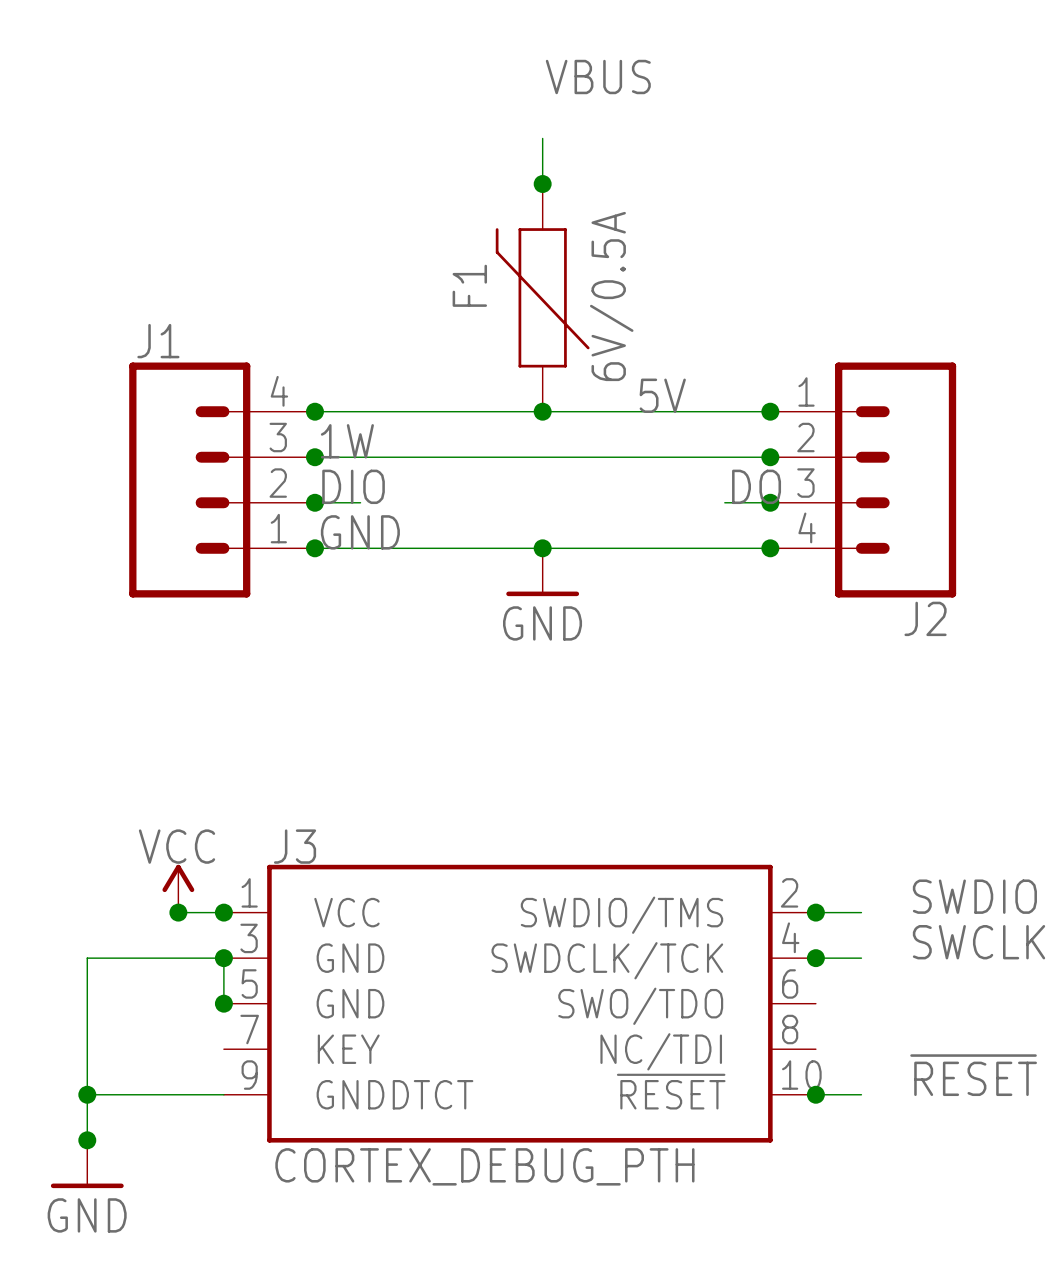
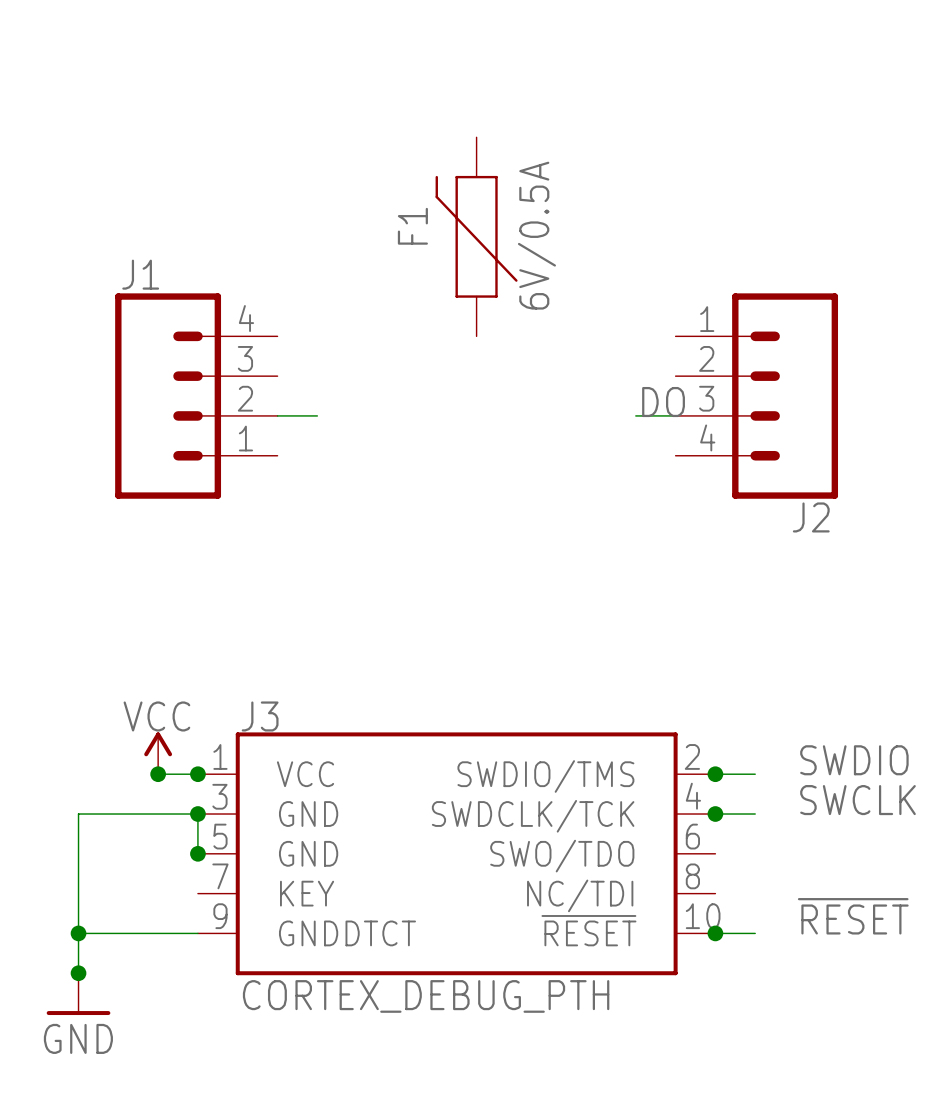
label: VBUS (598, 77) -> none
wire: (542, 138) (542, 184) -> none
junction: (542, 184) -> none
label: 5V (662, 395) -> none
wire: (314, 411) (770, 411) -> none
junction: (314, 411) -> none
junction: (542, 411) -> none
junction: (770, 411) -> none
label: 1W (347, 441) -> none
wire: (314, 457) (770, 457) -> none
junction: (314, 457) -> none
junction: (770, 457) -> none
label: DIO (353, 486) -> none
junction: (314, 502) -> none
junction: (770, 502) -> none
label: GND (360, 532) -> none
wire: (314, 548) (770, 548) -> none
junction: (314, 548) -> none
junction: (542, 548) -> none
junction: (770, 548) -> none
power symbol: GND (542, 572) -> none

